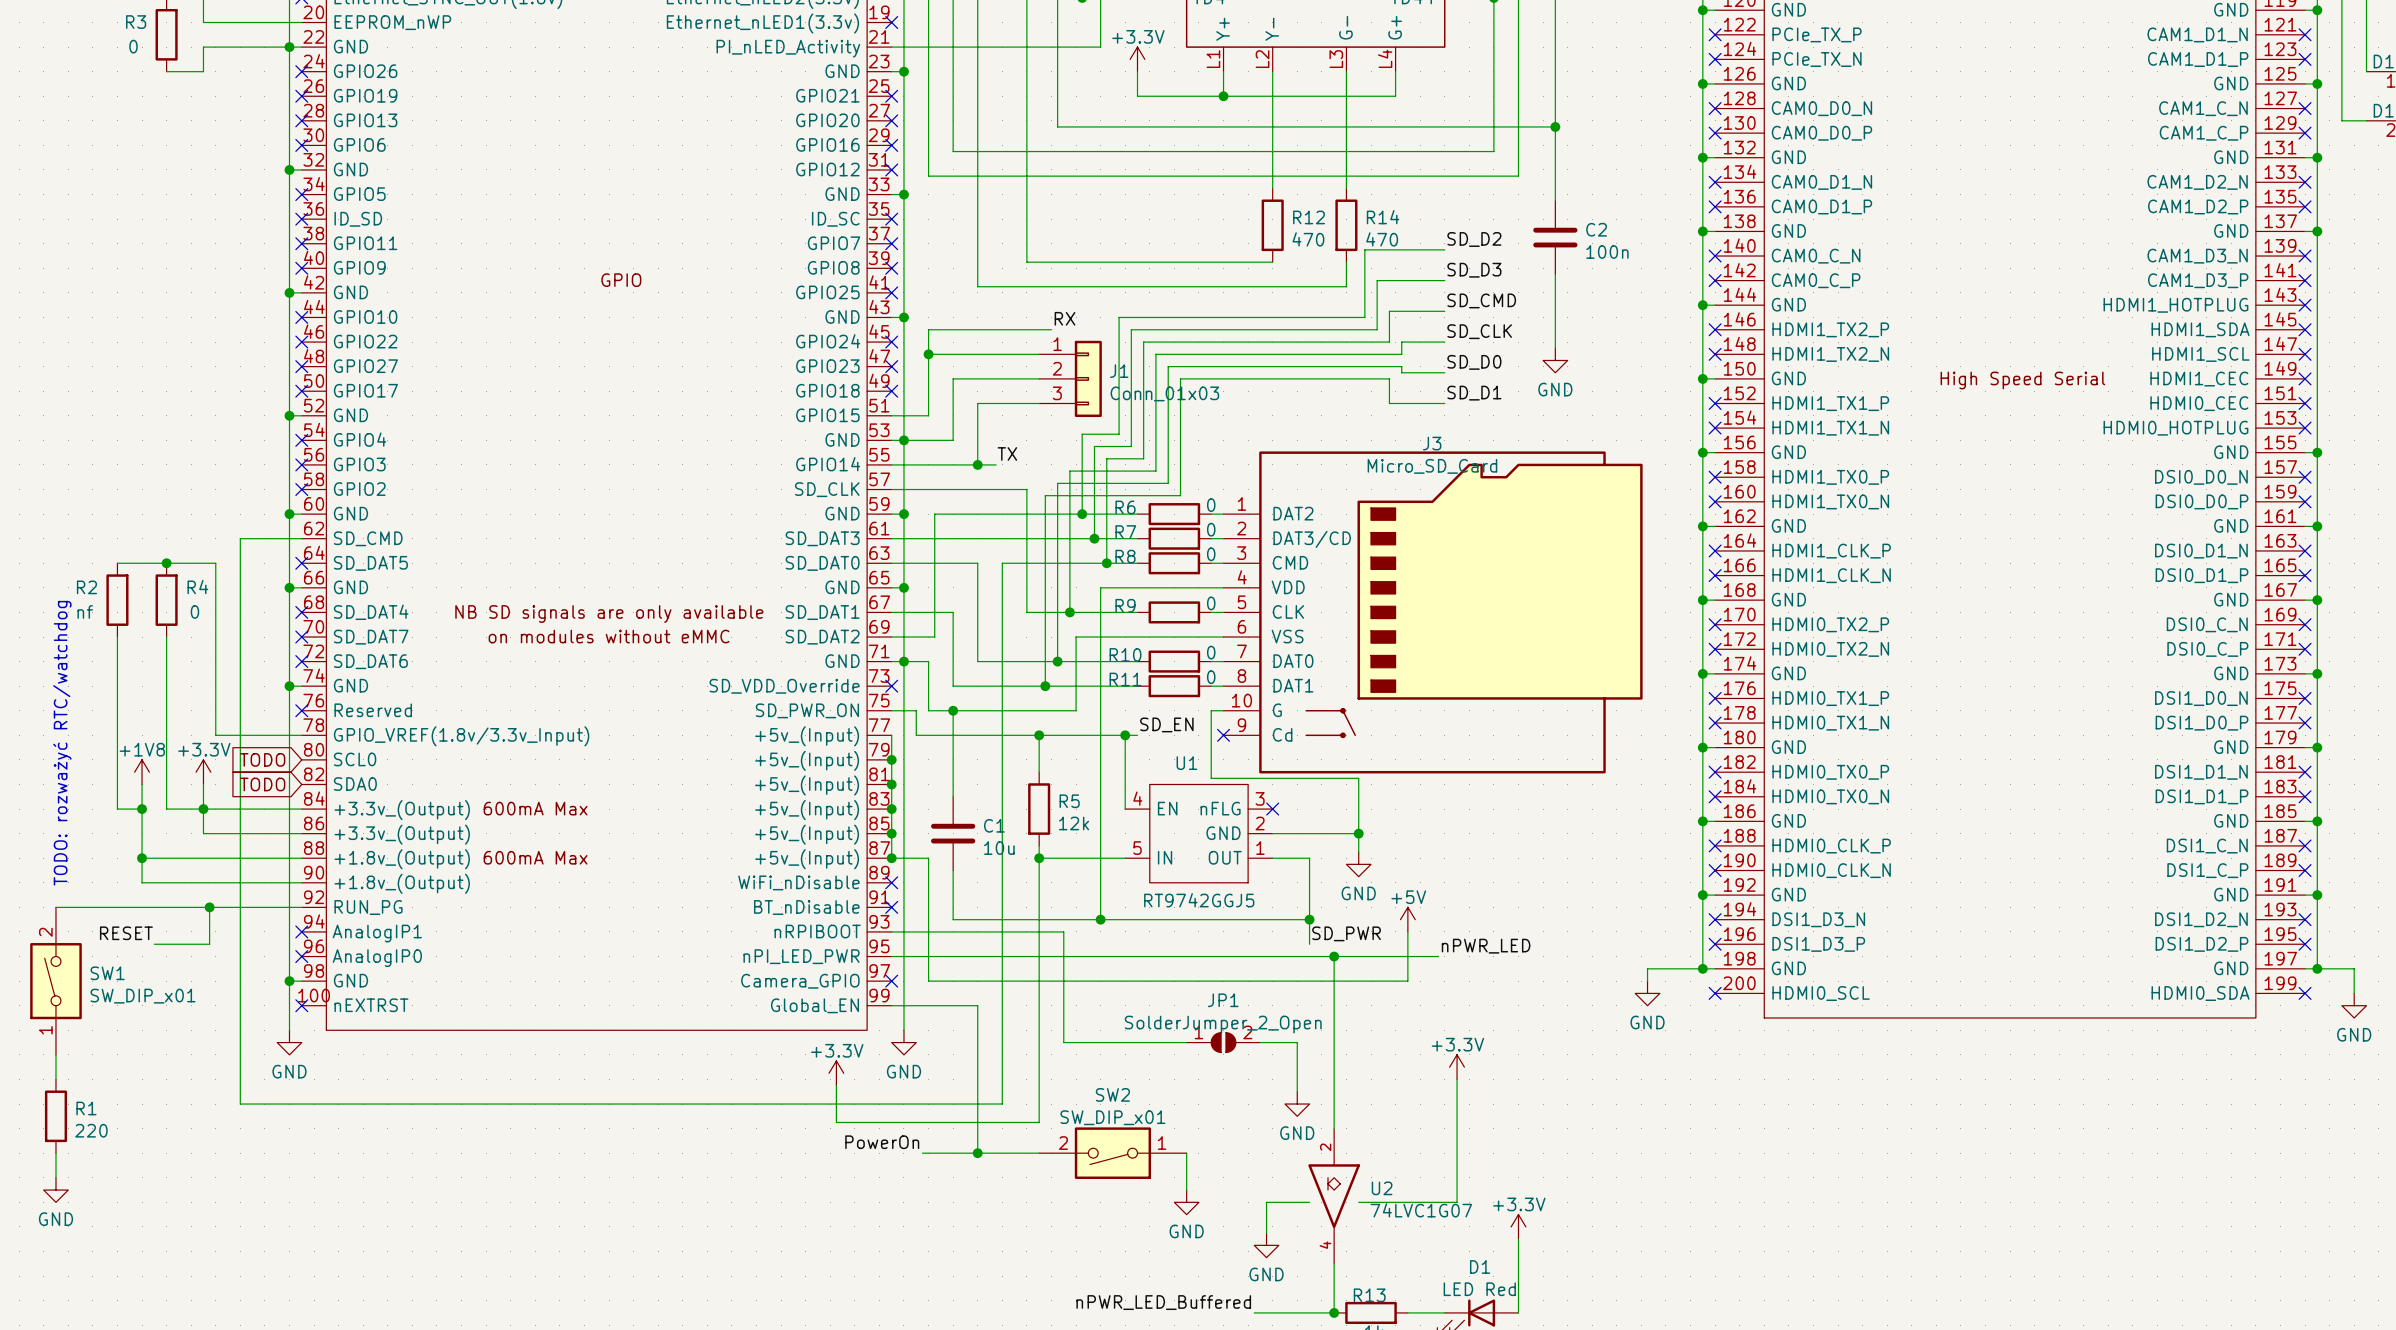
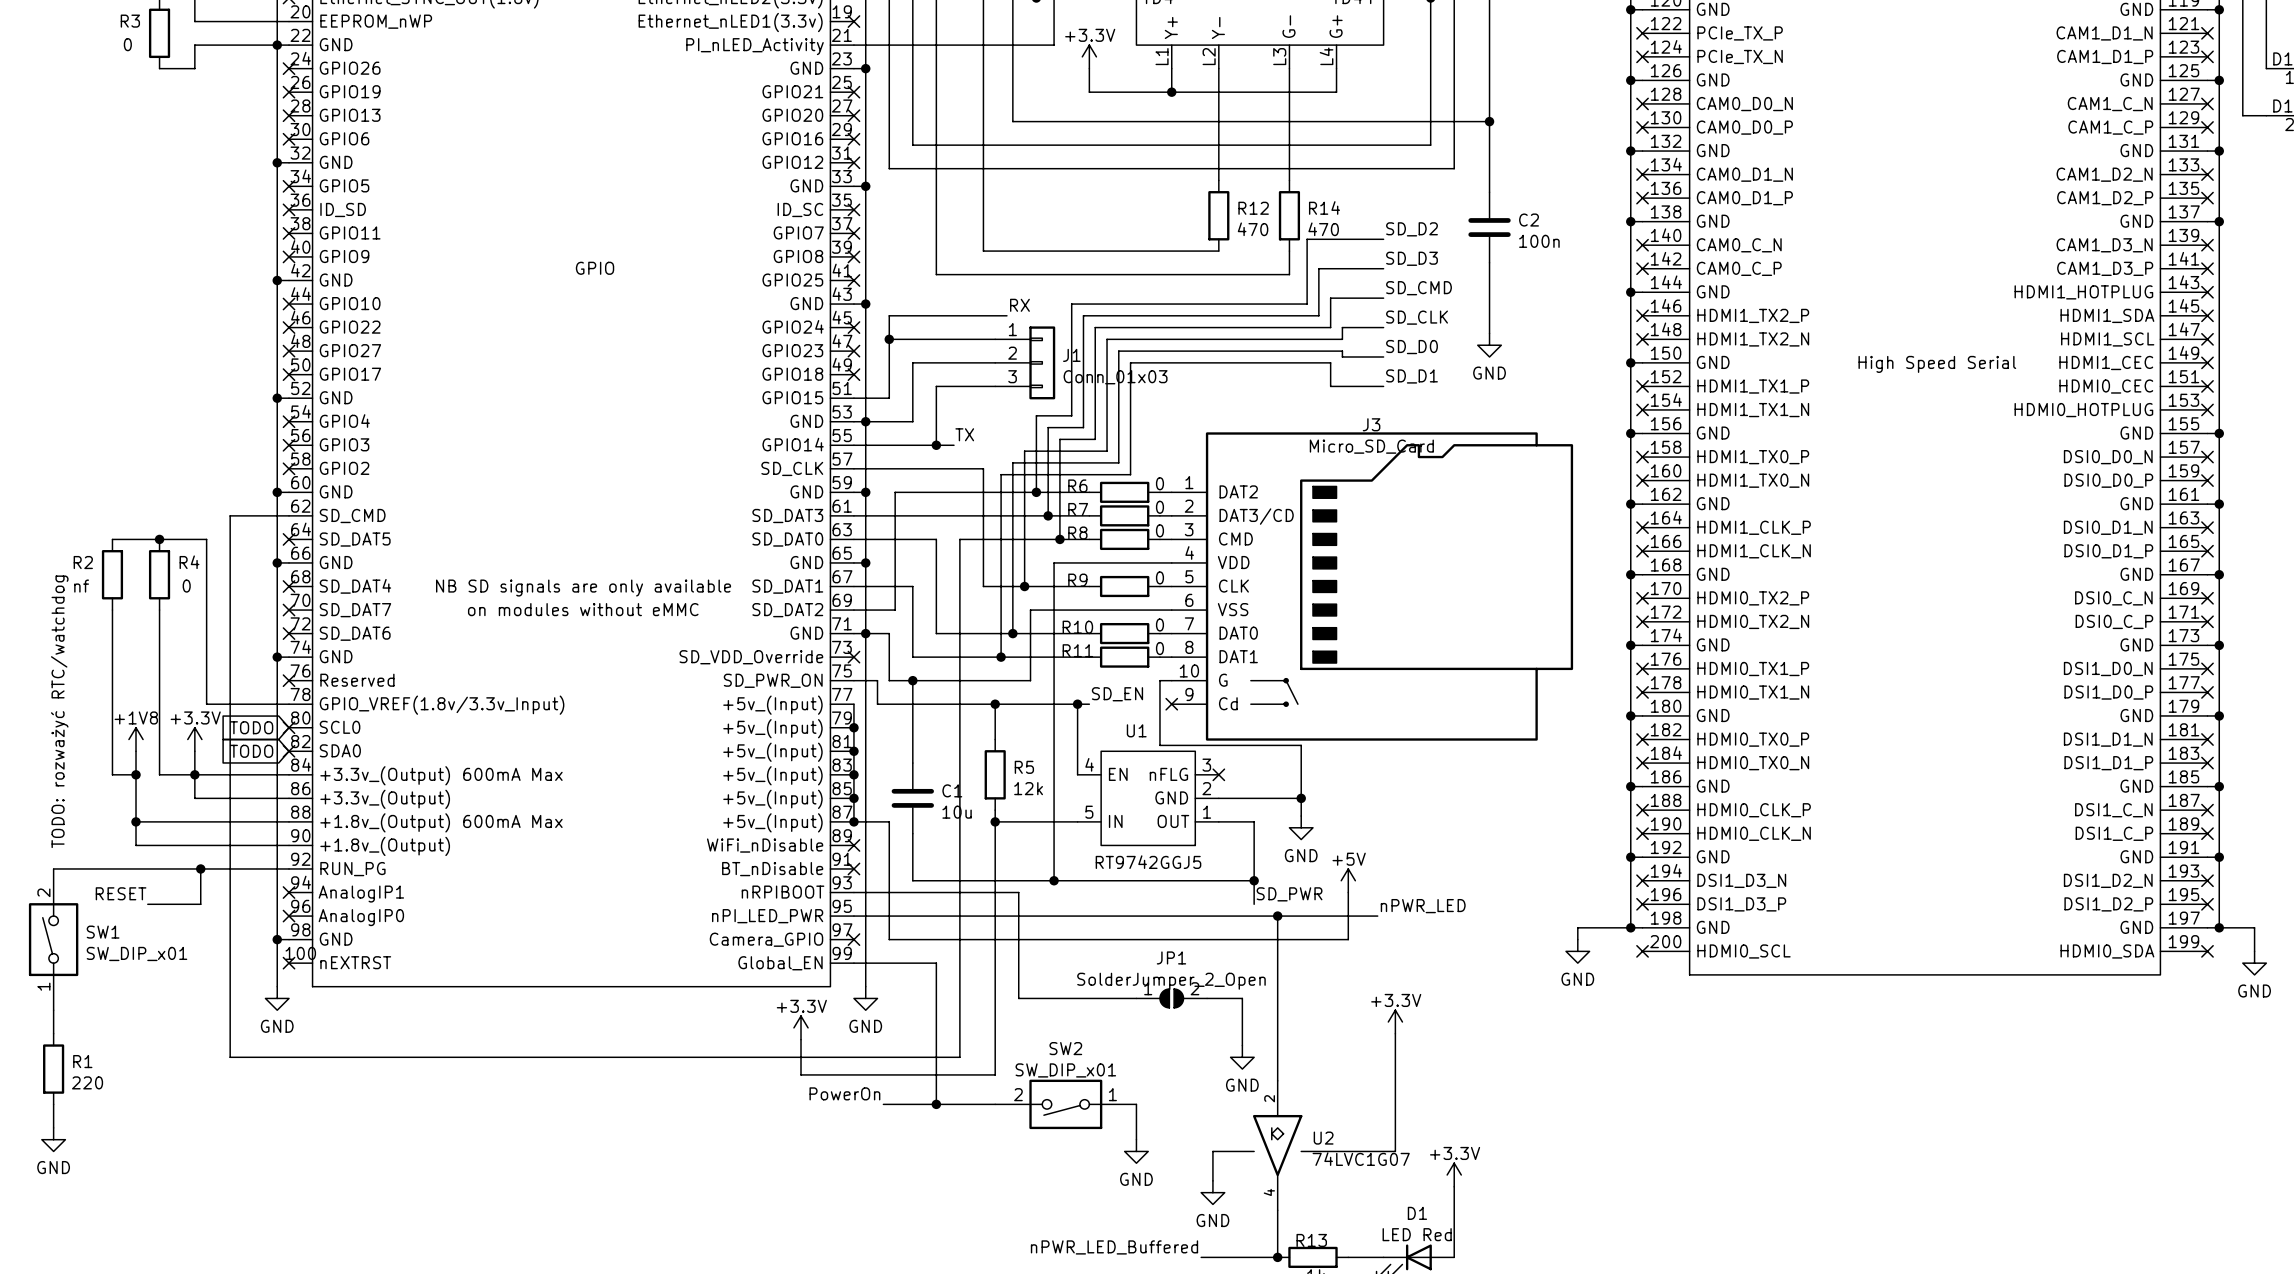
no-connect mark: none -> (289, 727)
no-connect mark: none -> (289, 751)

